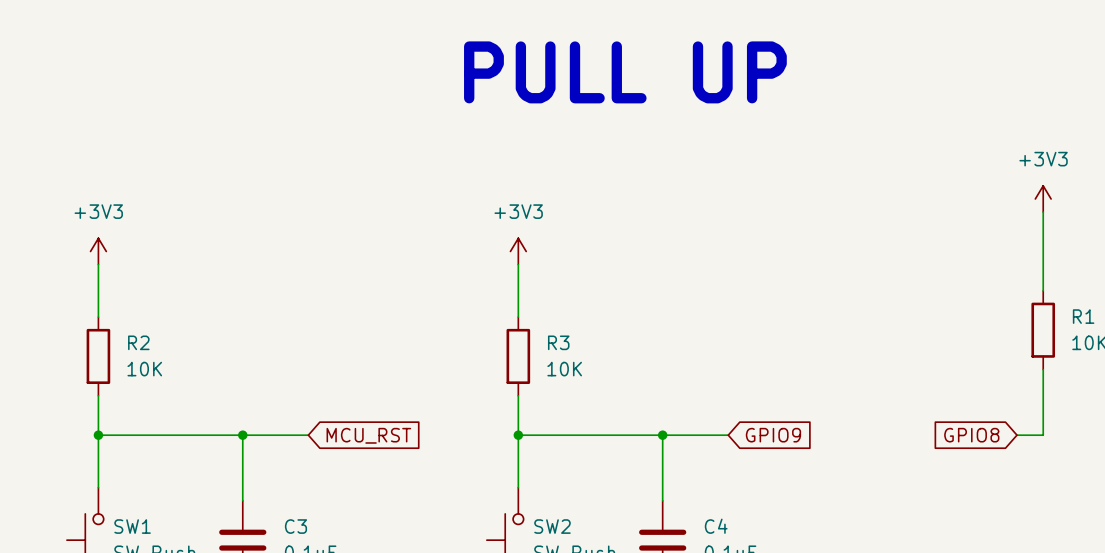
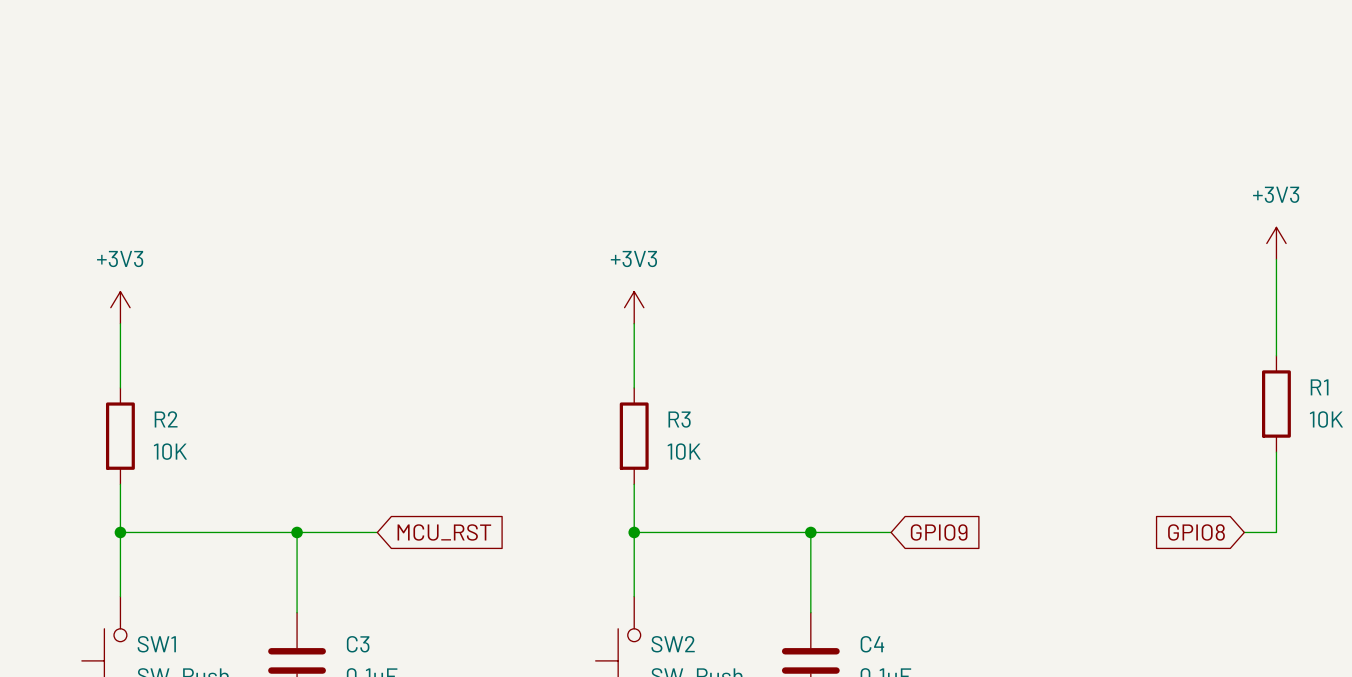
text: PULL UP (625, 72) -> none

